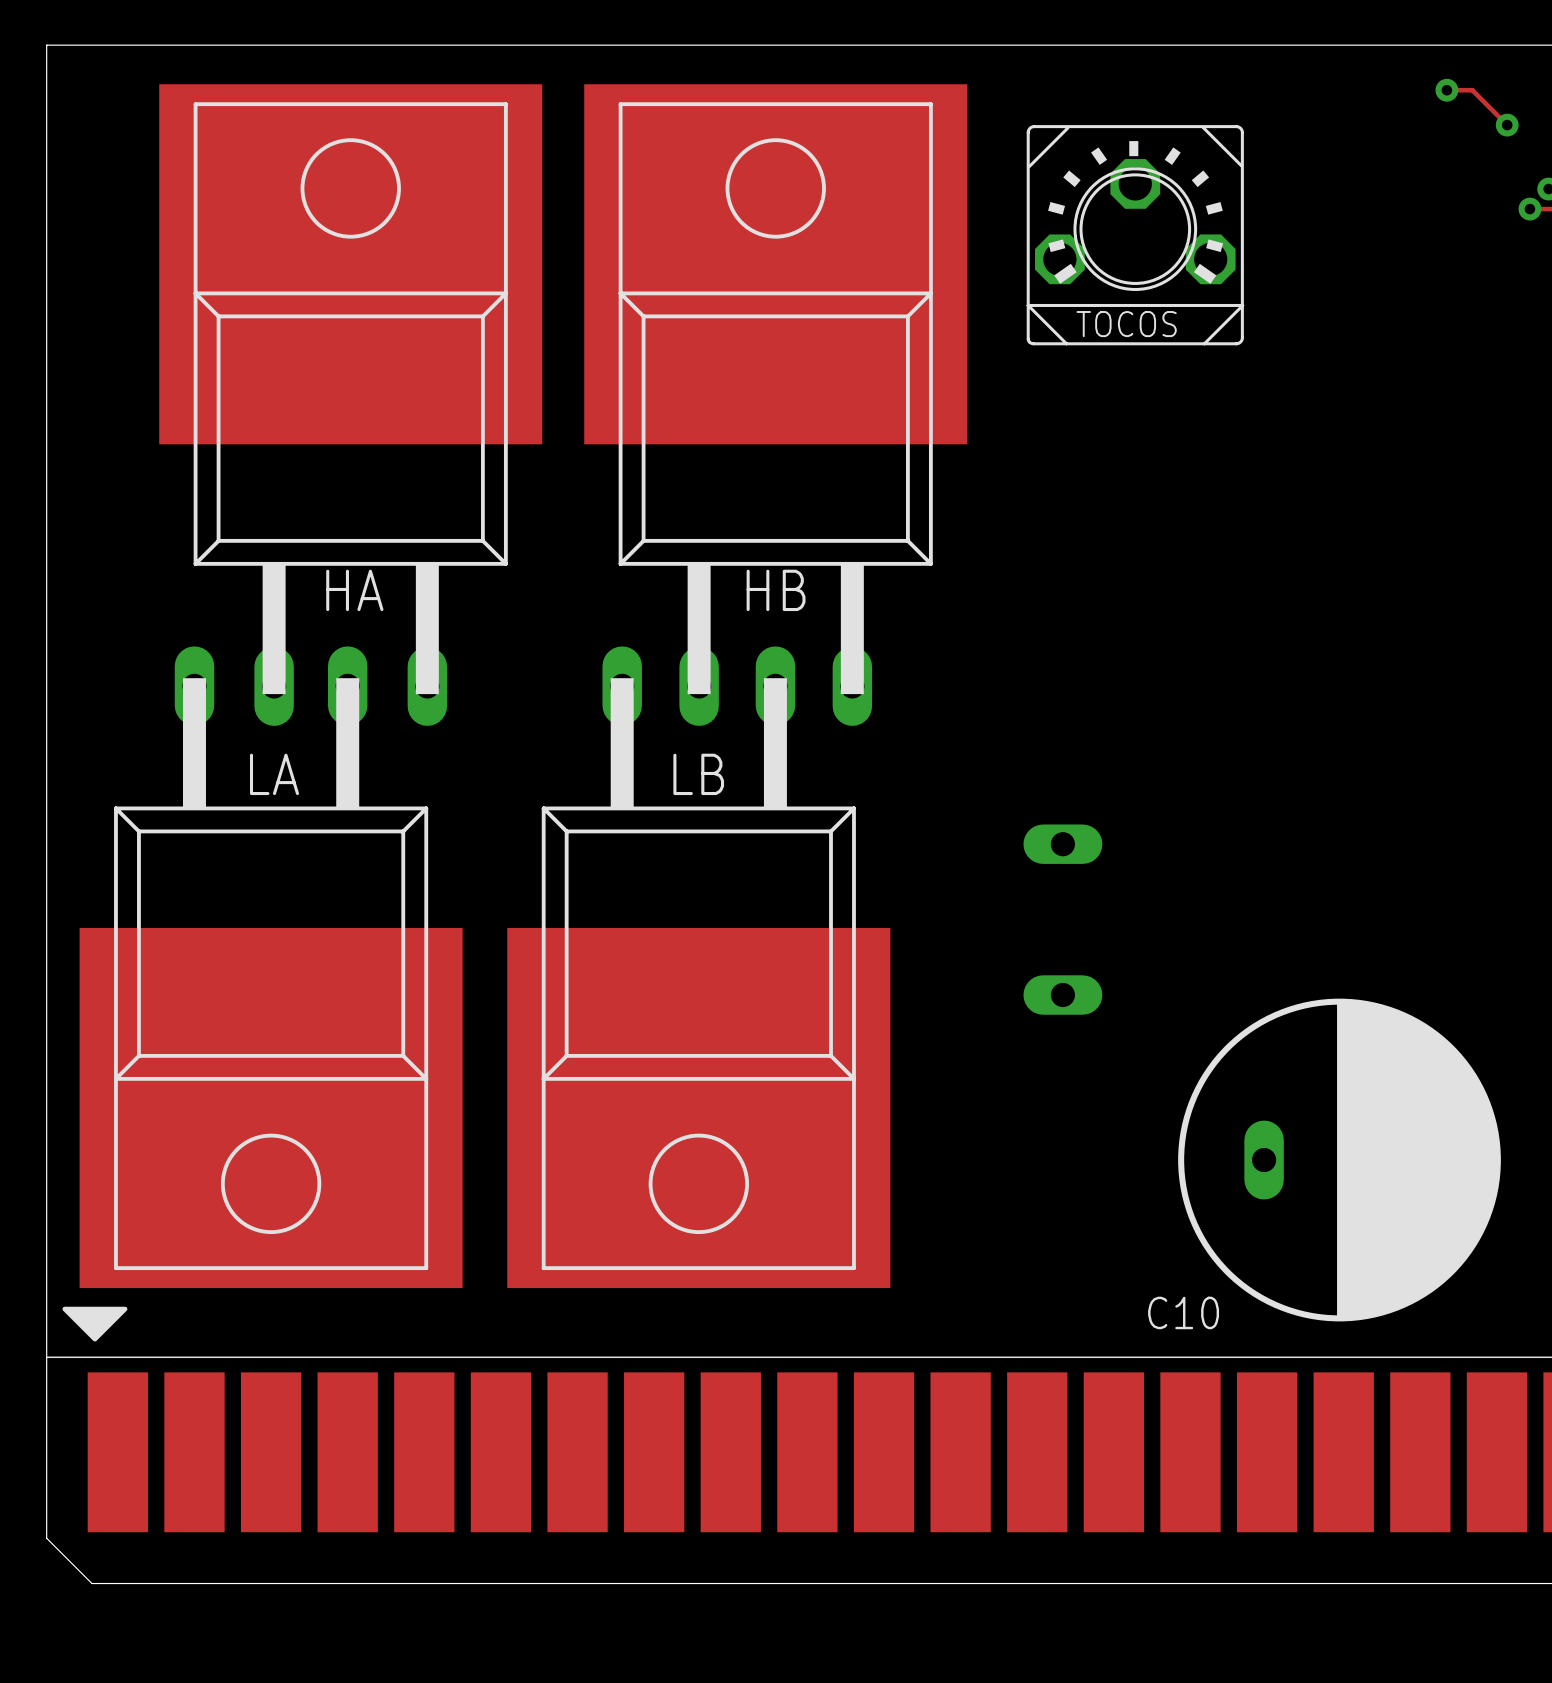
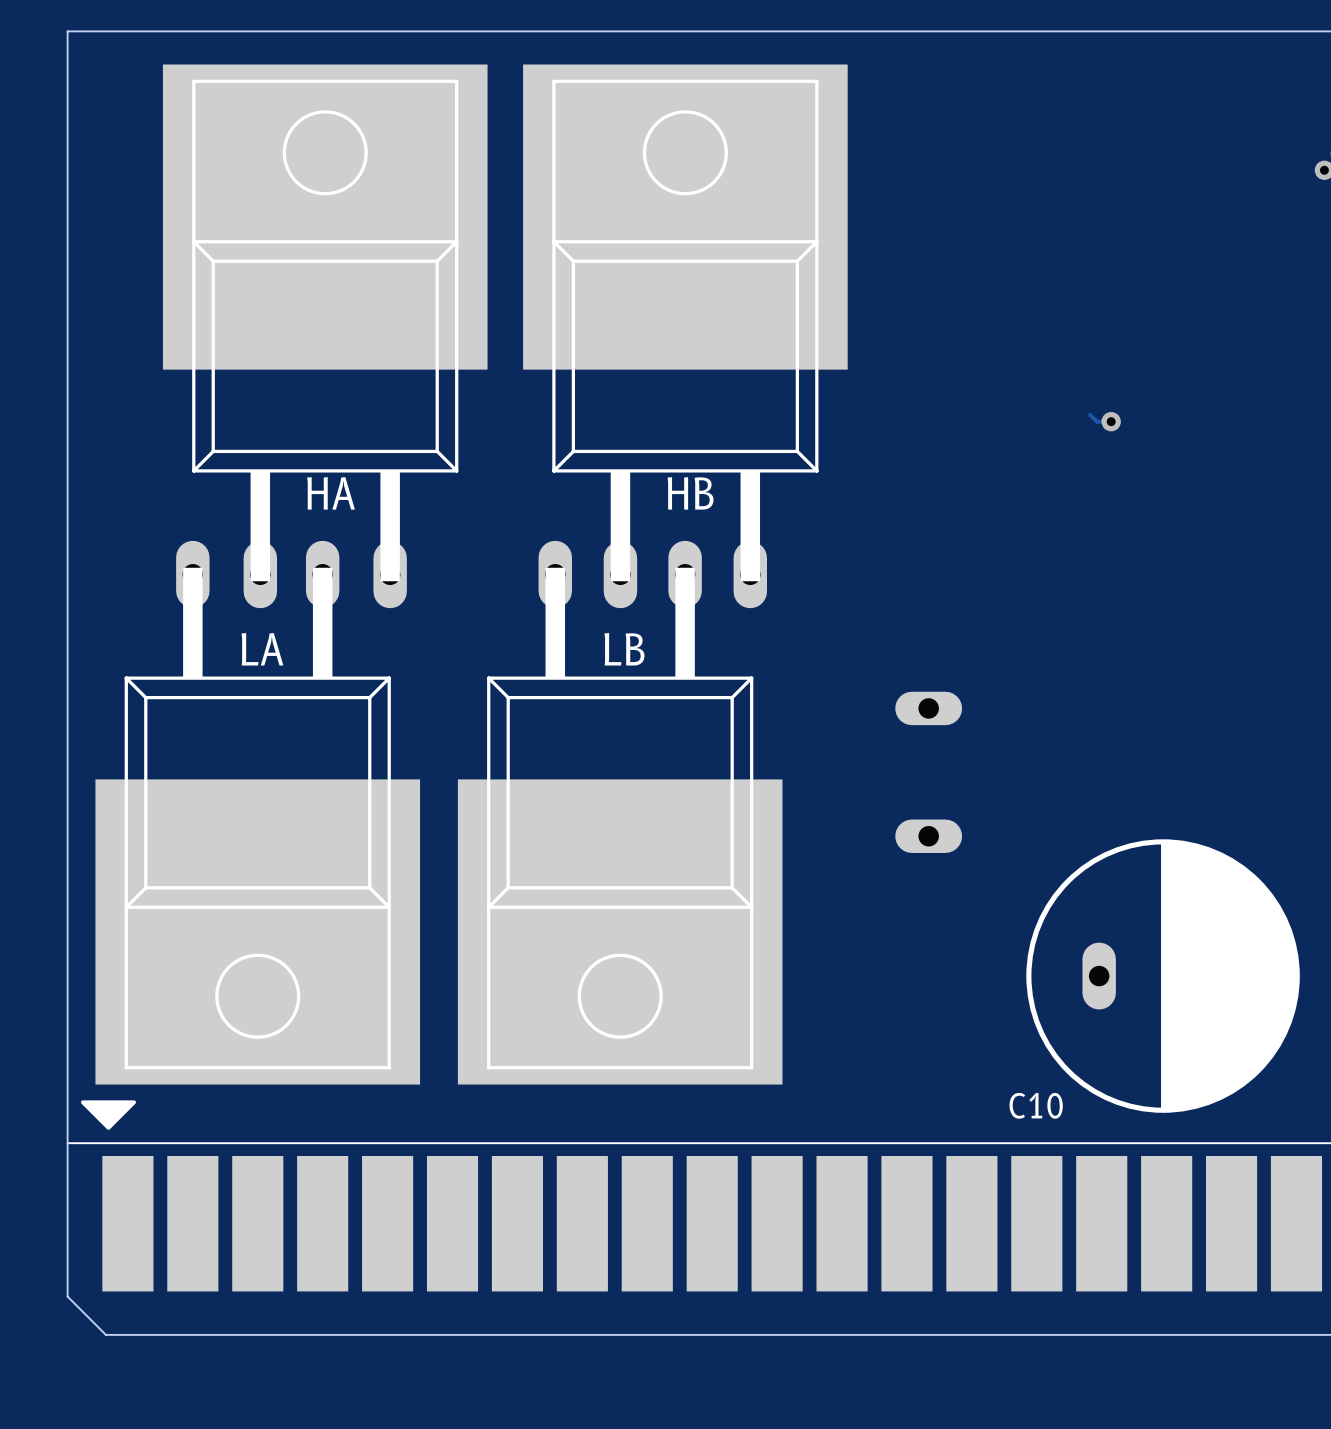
track: (1446, 90) (1472, 90) (1507, 125) -> none
via: (1446, 90) -> none
via: (1507, 125) -> none
part: (1135, 235) -> none
track: none -> (1089, 414) (1096, 421) (1111, 421)
via: none -> (1111, 421)

